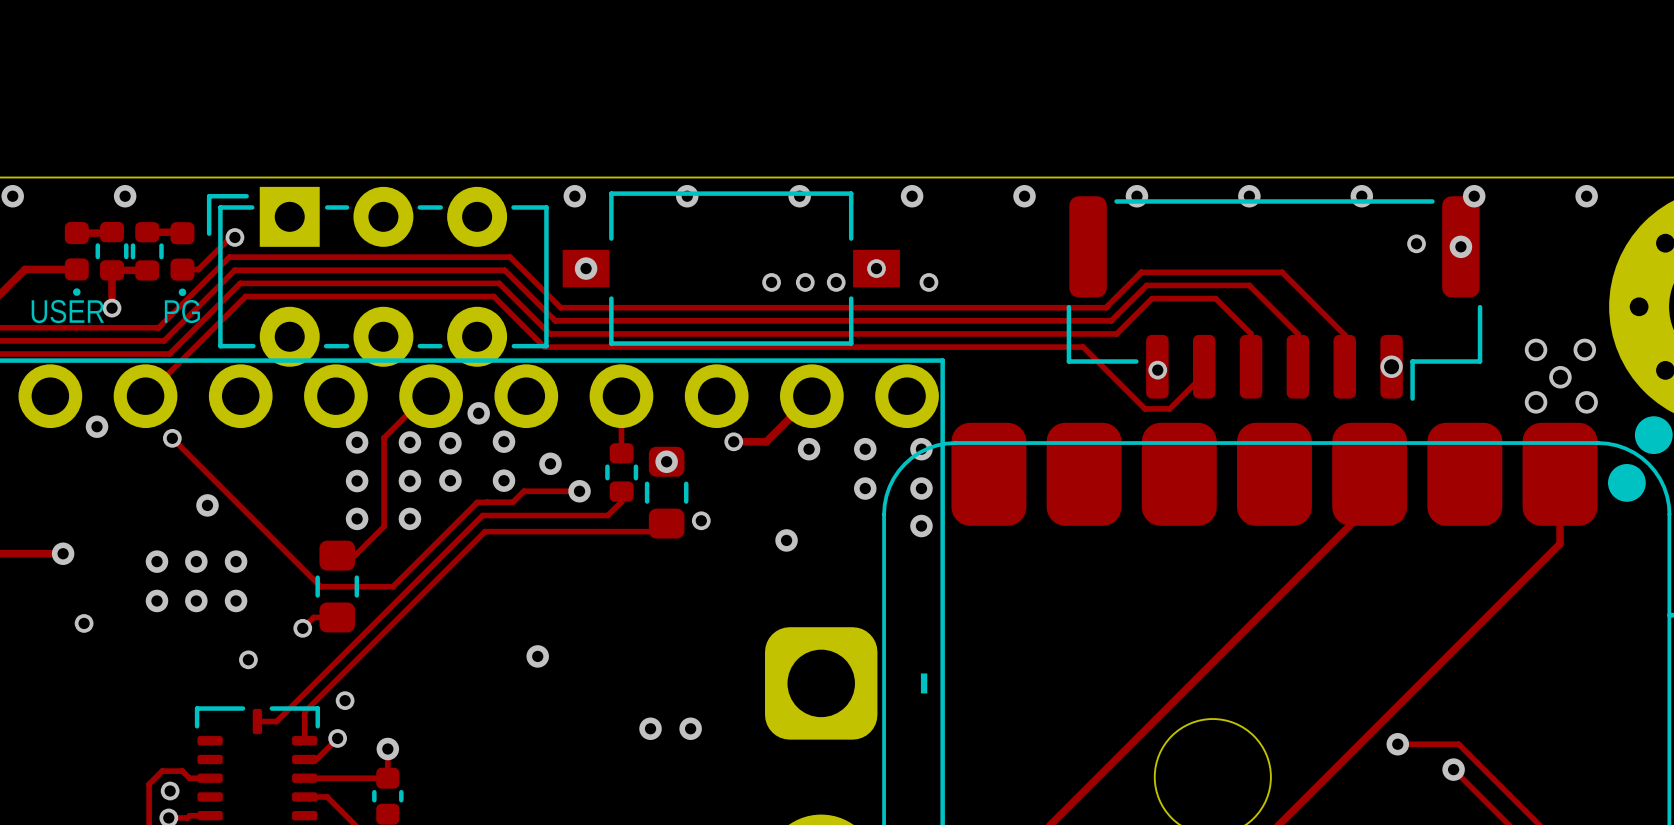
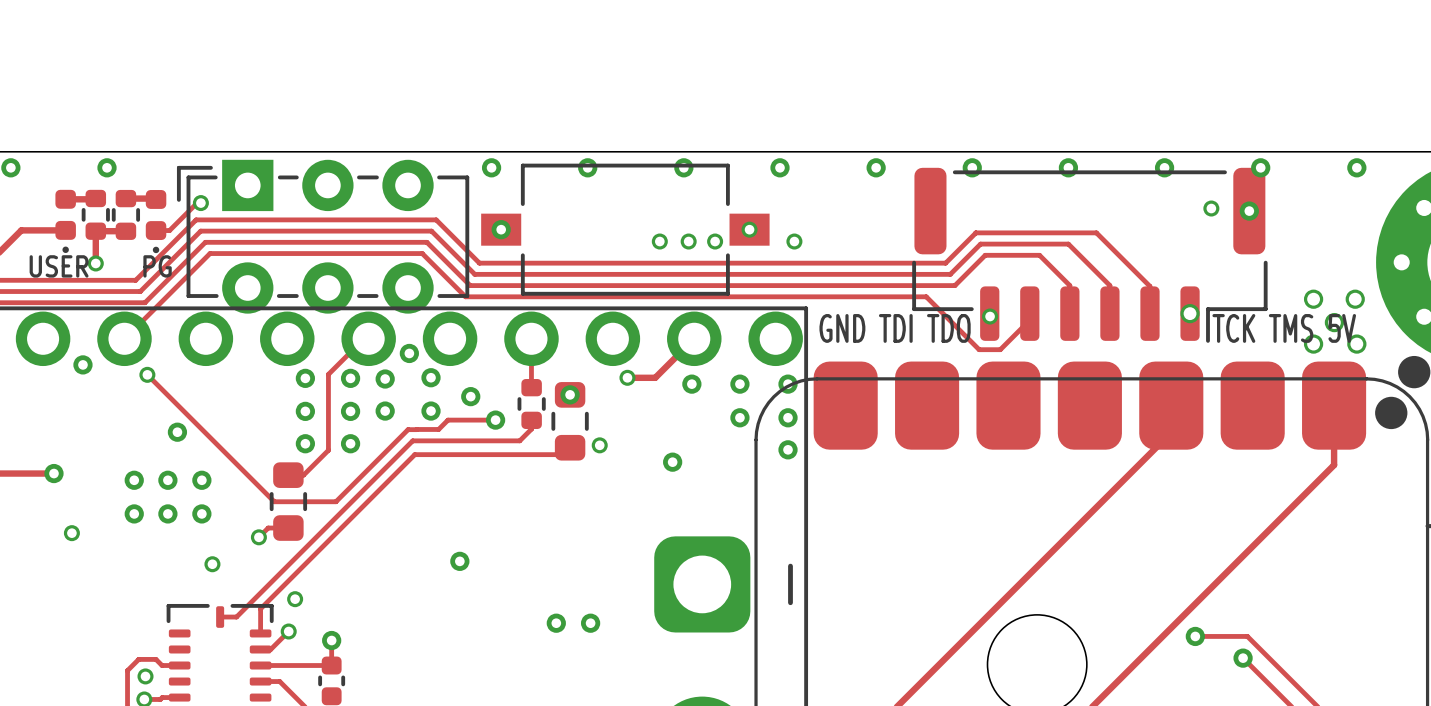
text: none -> GND TDI TDO (895, 328)
text: none -> TCK TMS 5V (1284, 328)

